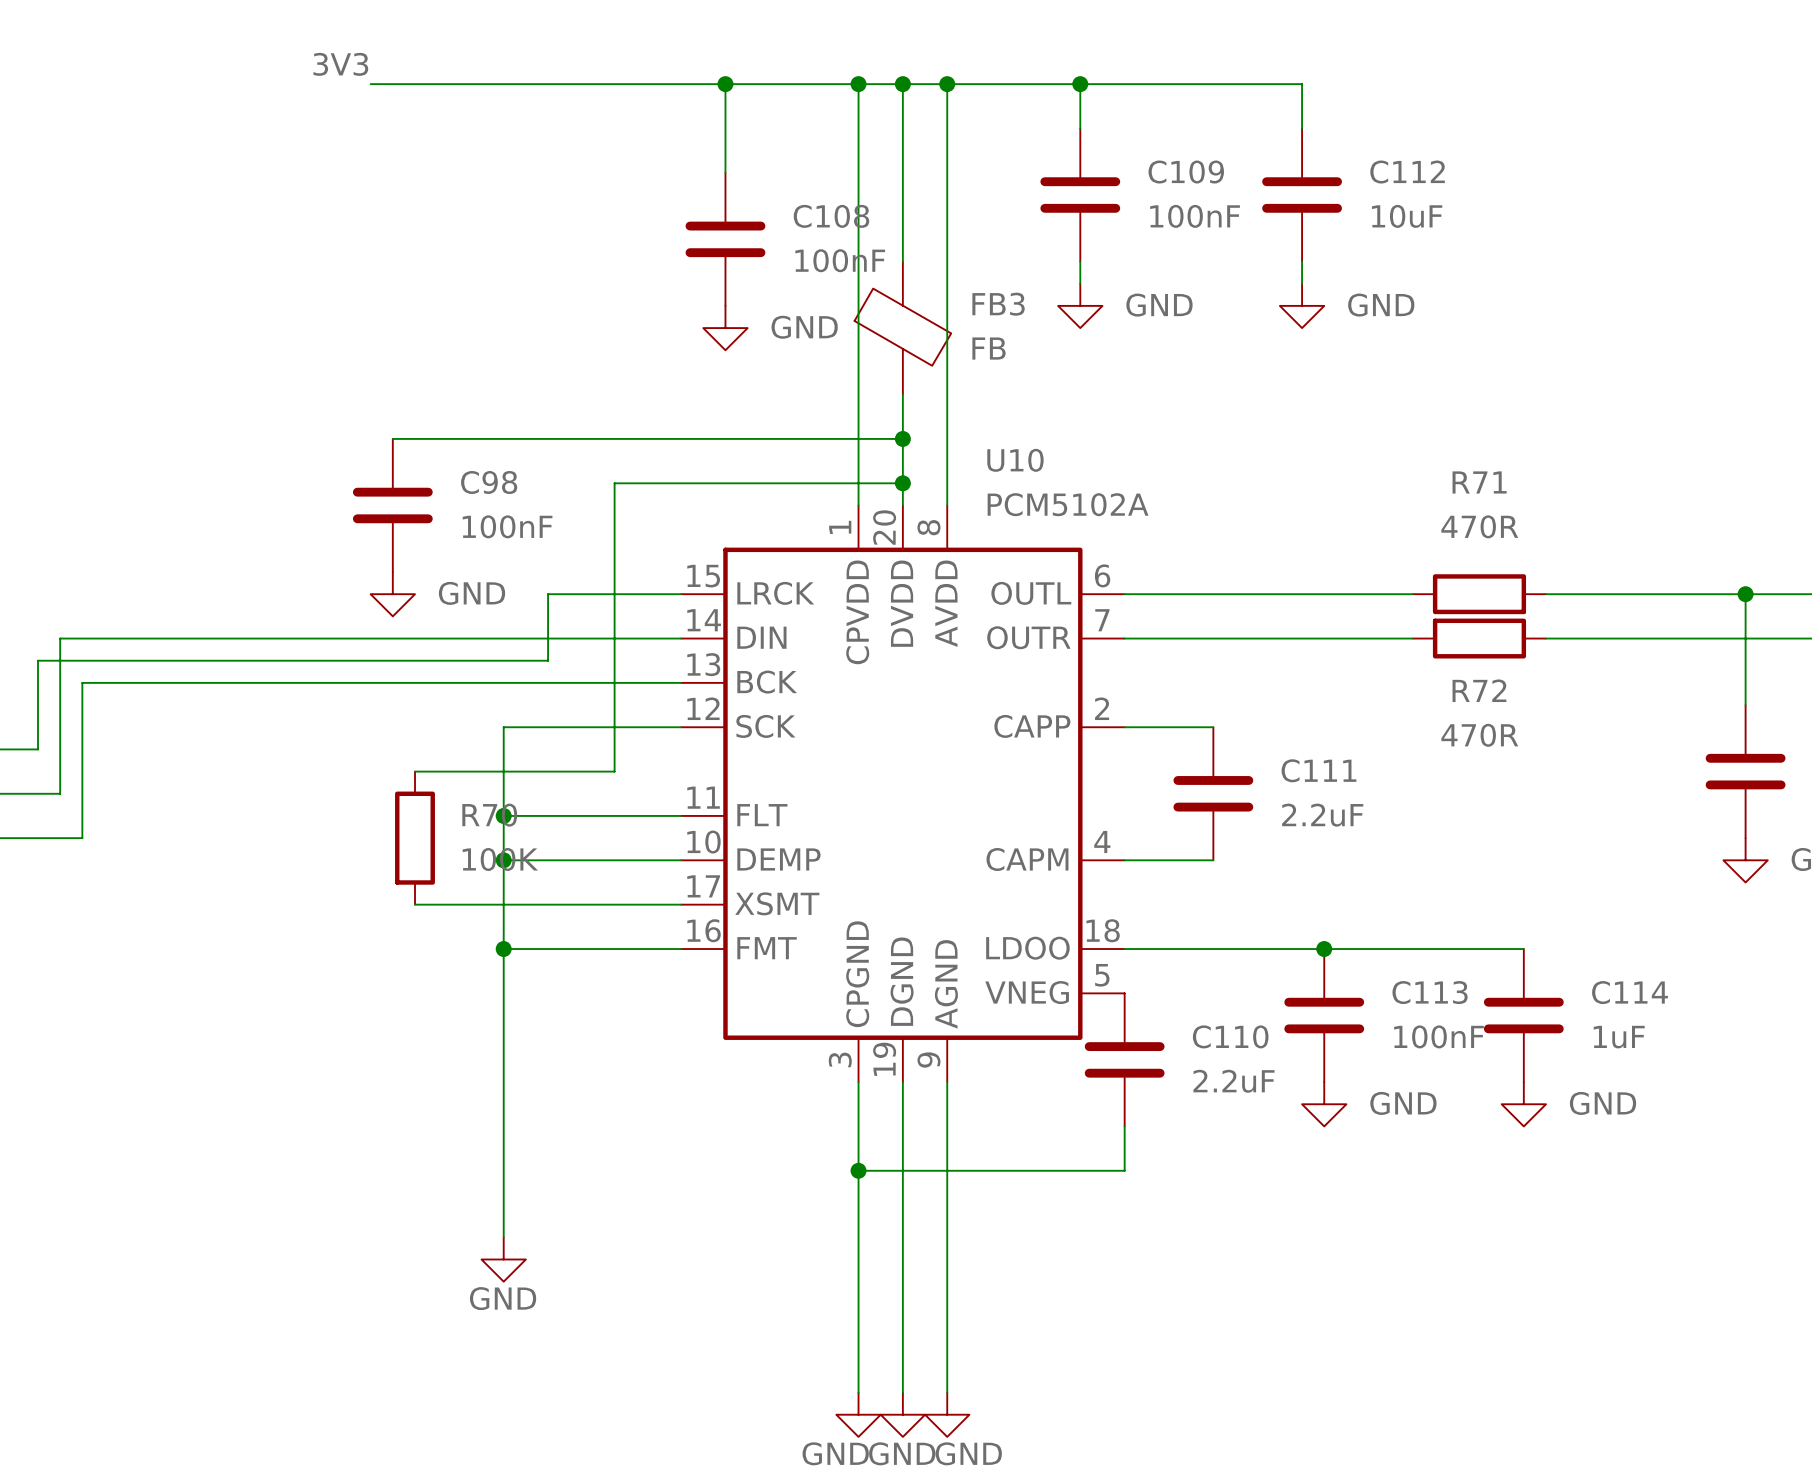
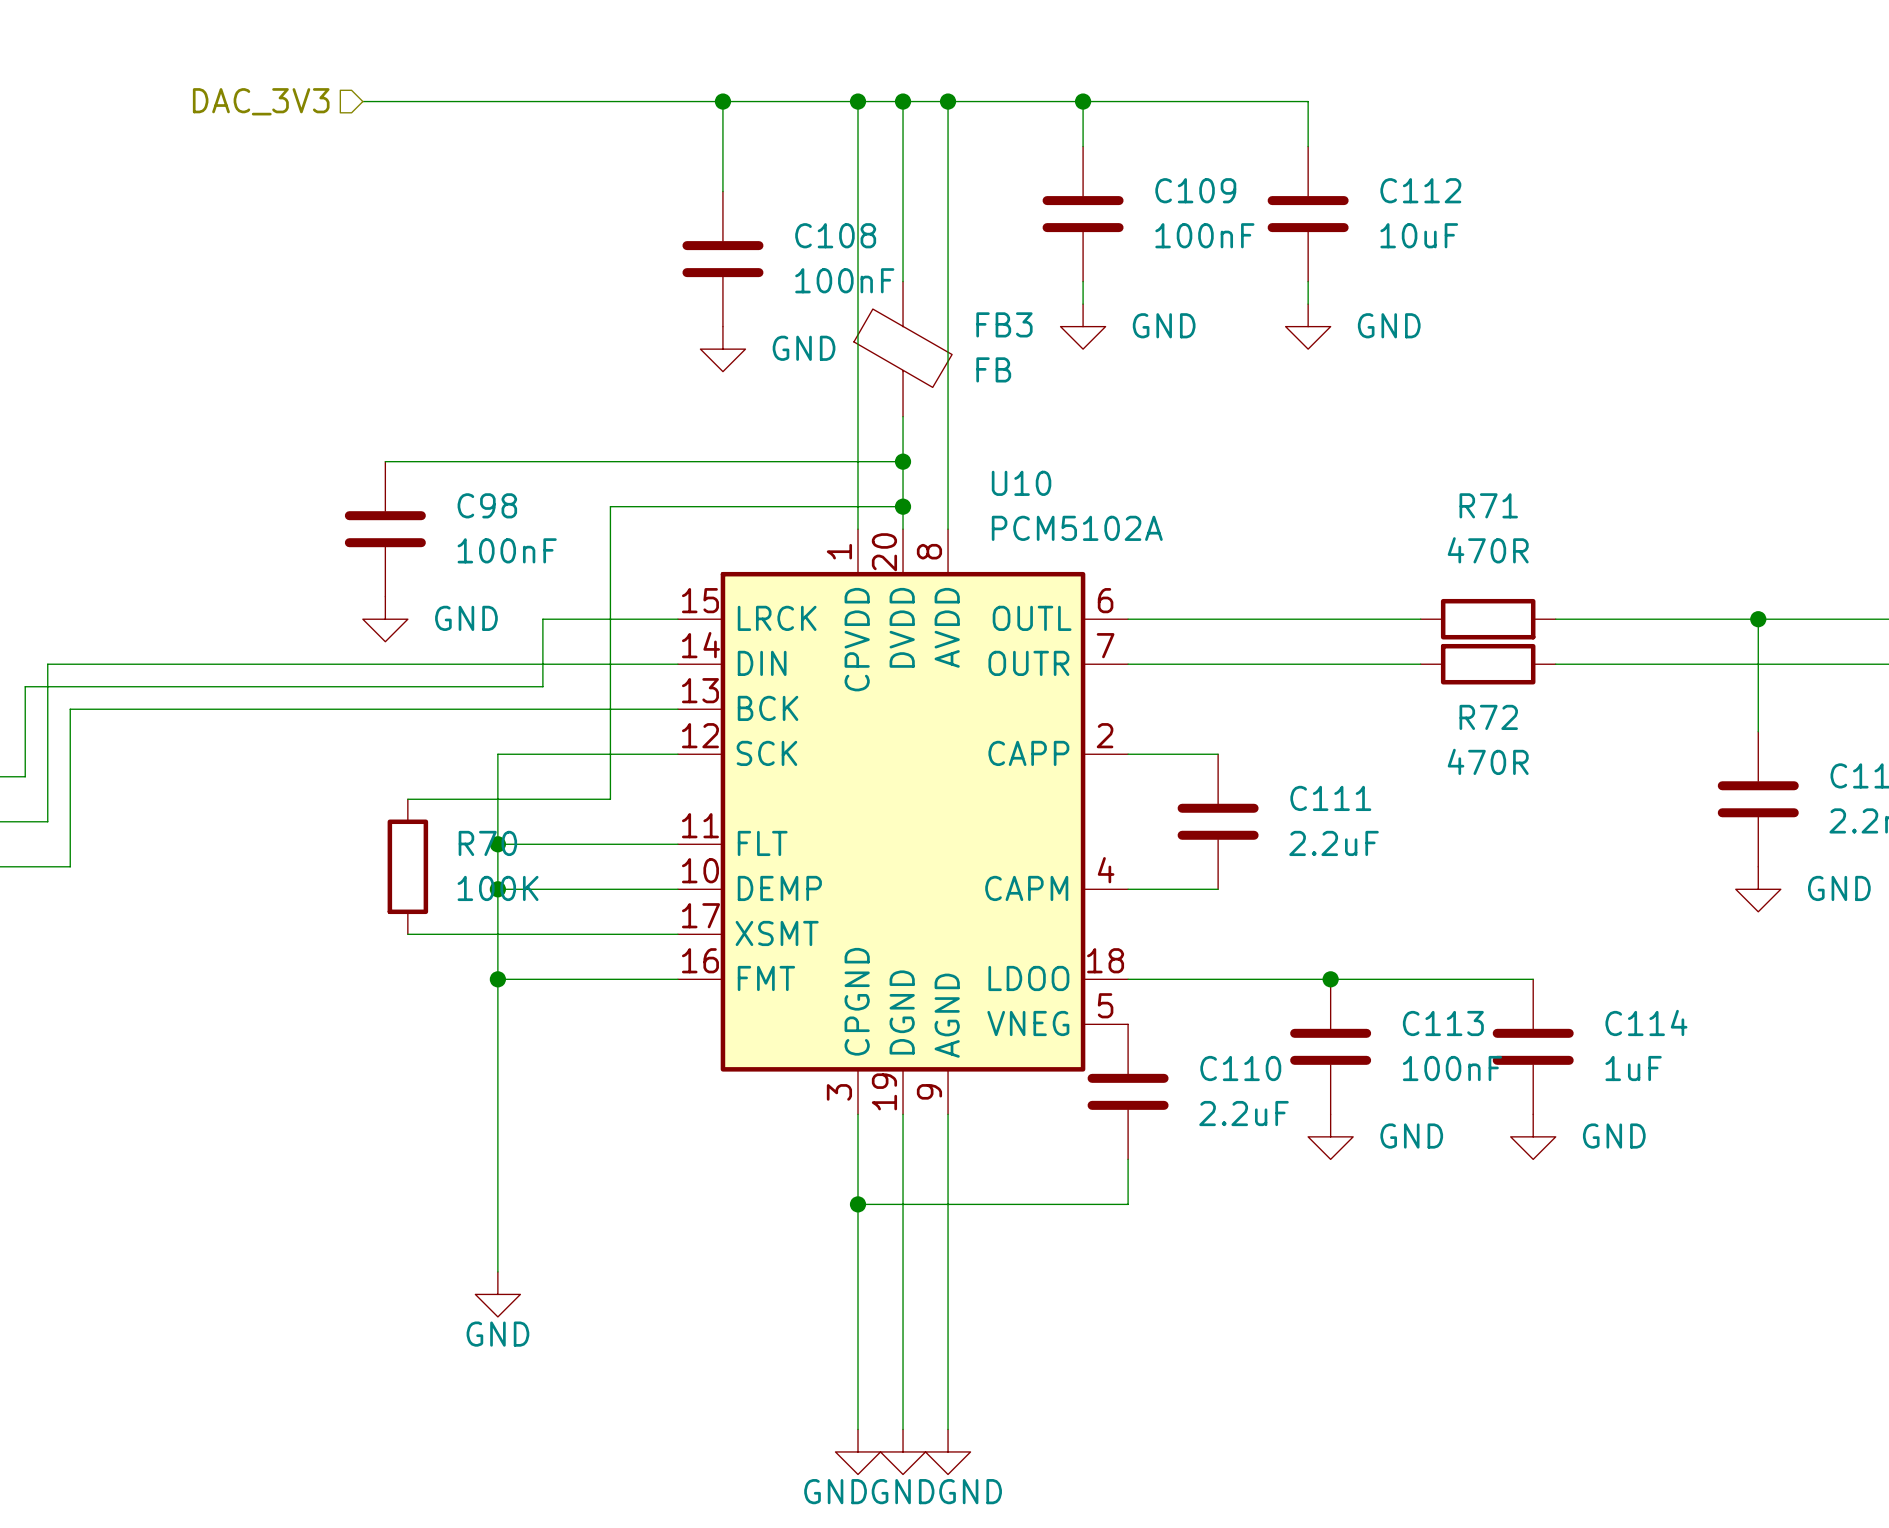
label: 3V3 (340, 64) -> none
hierarchical label: none -> DAC_3V3 (261, 101)

